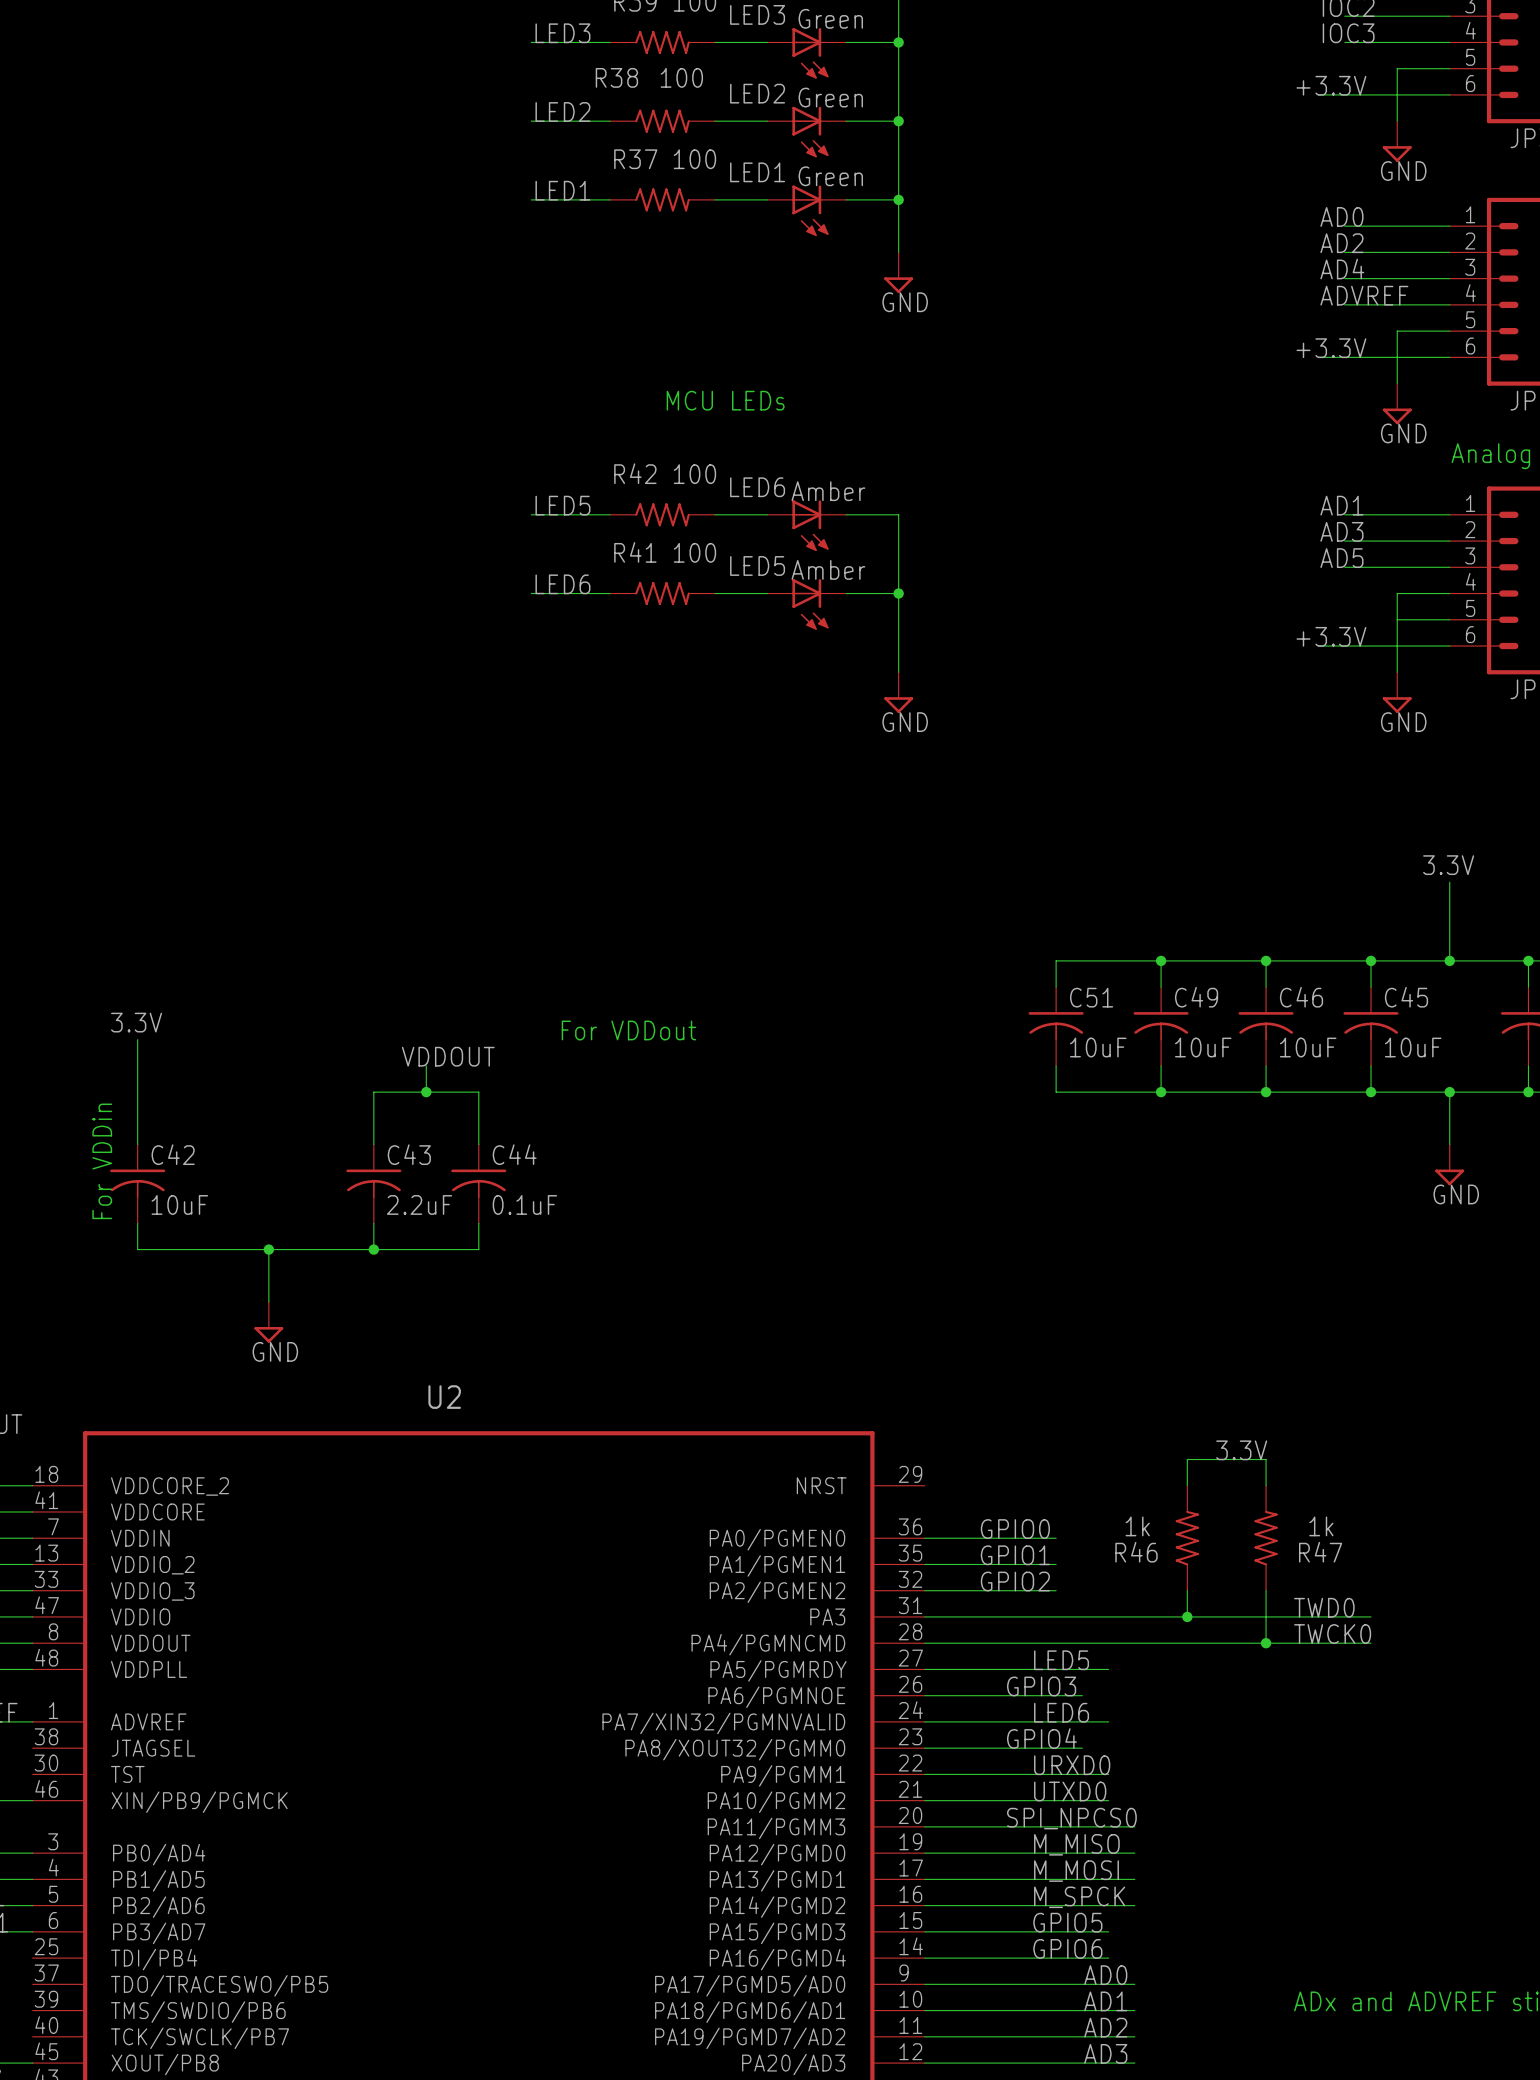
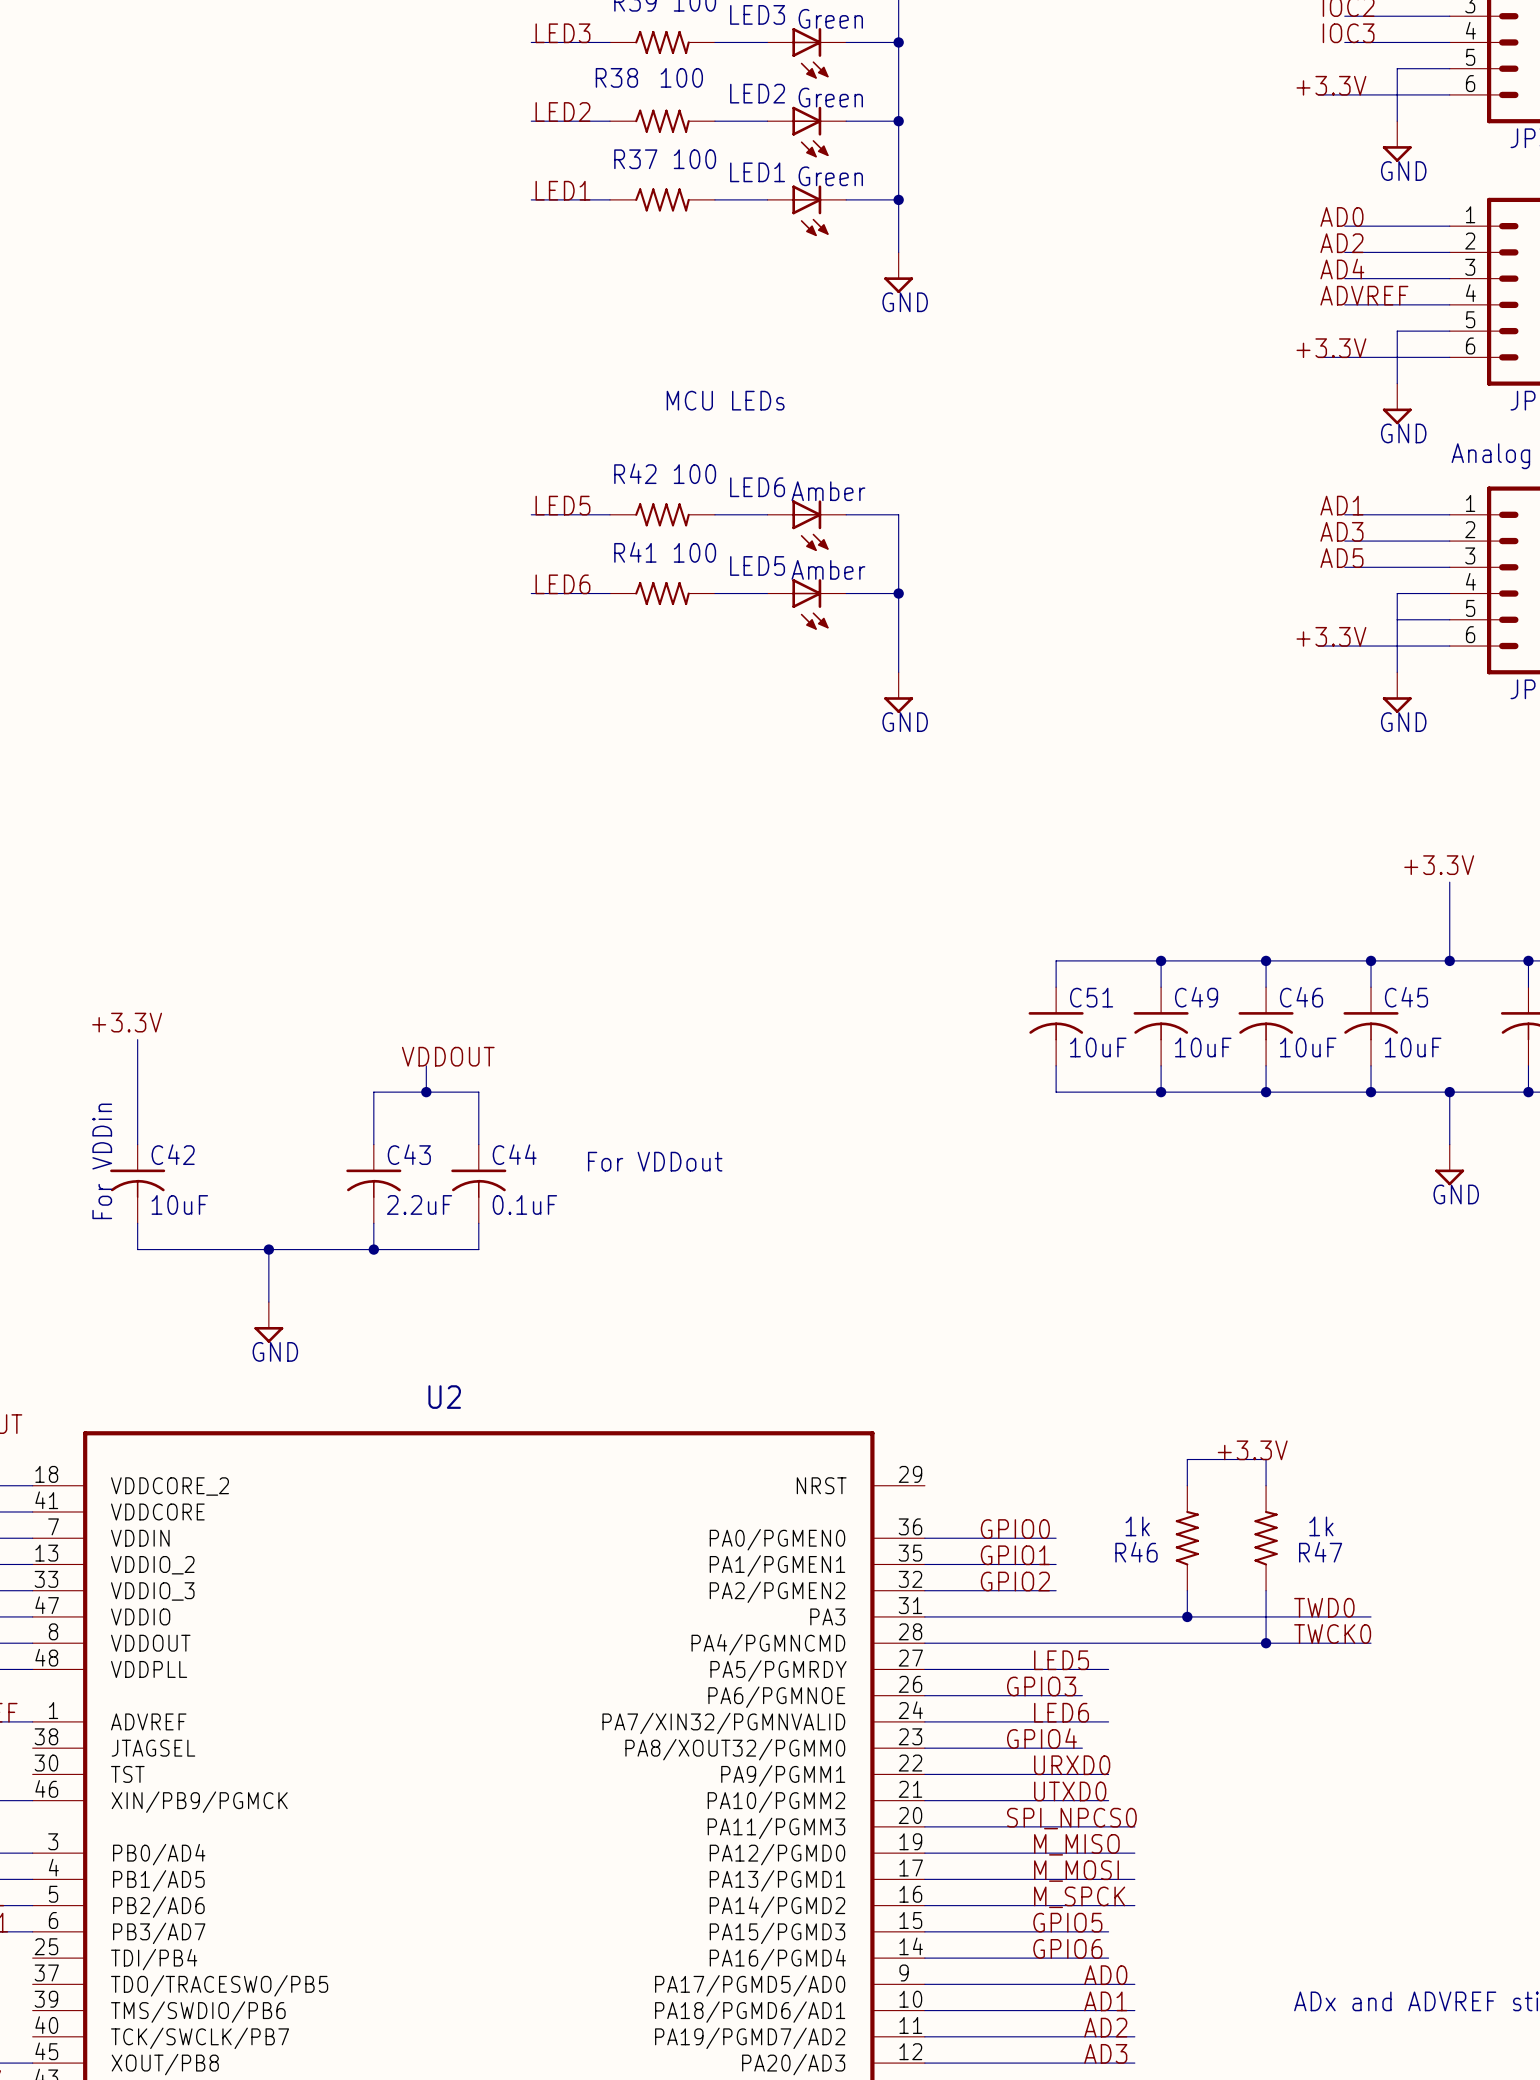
label: 3.3V (1448, 865) -> +3.3V (1439, 865)
label: 3.3V (136, 1022) -> +3.3V (127, 1022)
text position: For VDDout (628, 1030) -> For VDDout (655, 1161)
label: 3.3V (1241, 1450) -> +3.3V (1252, 1450)

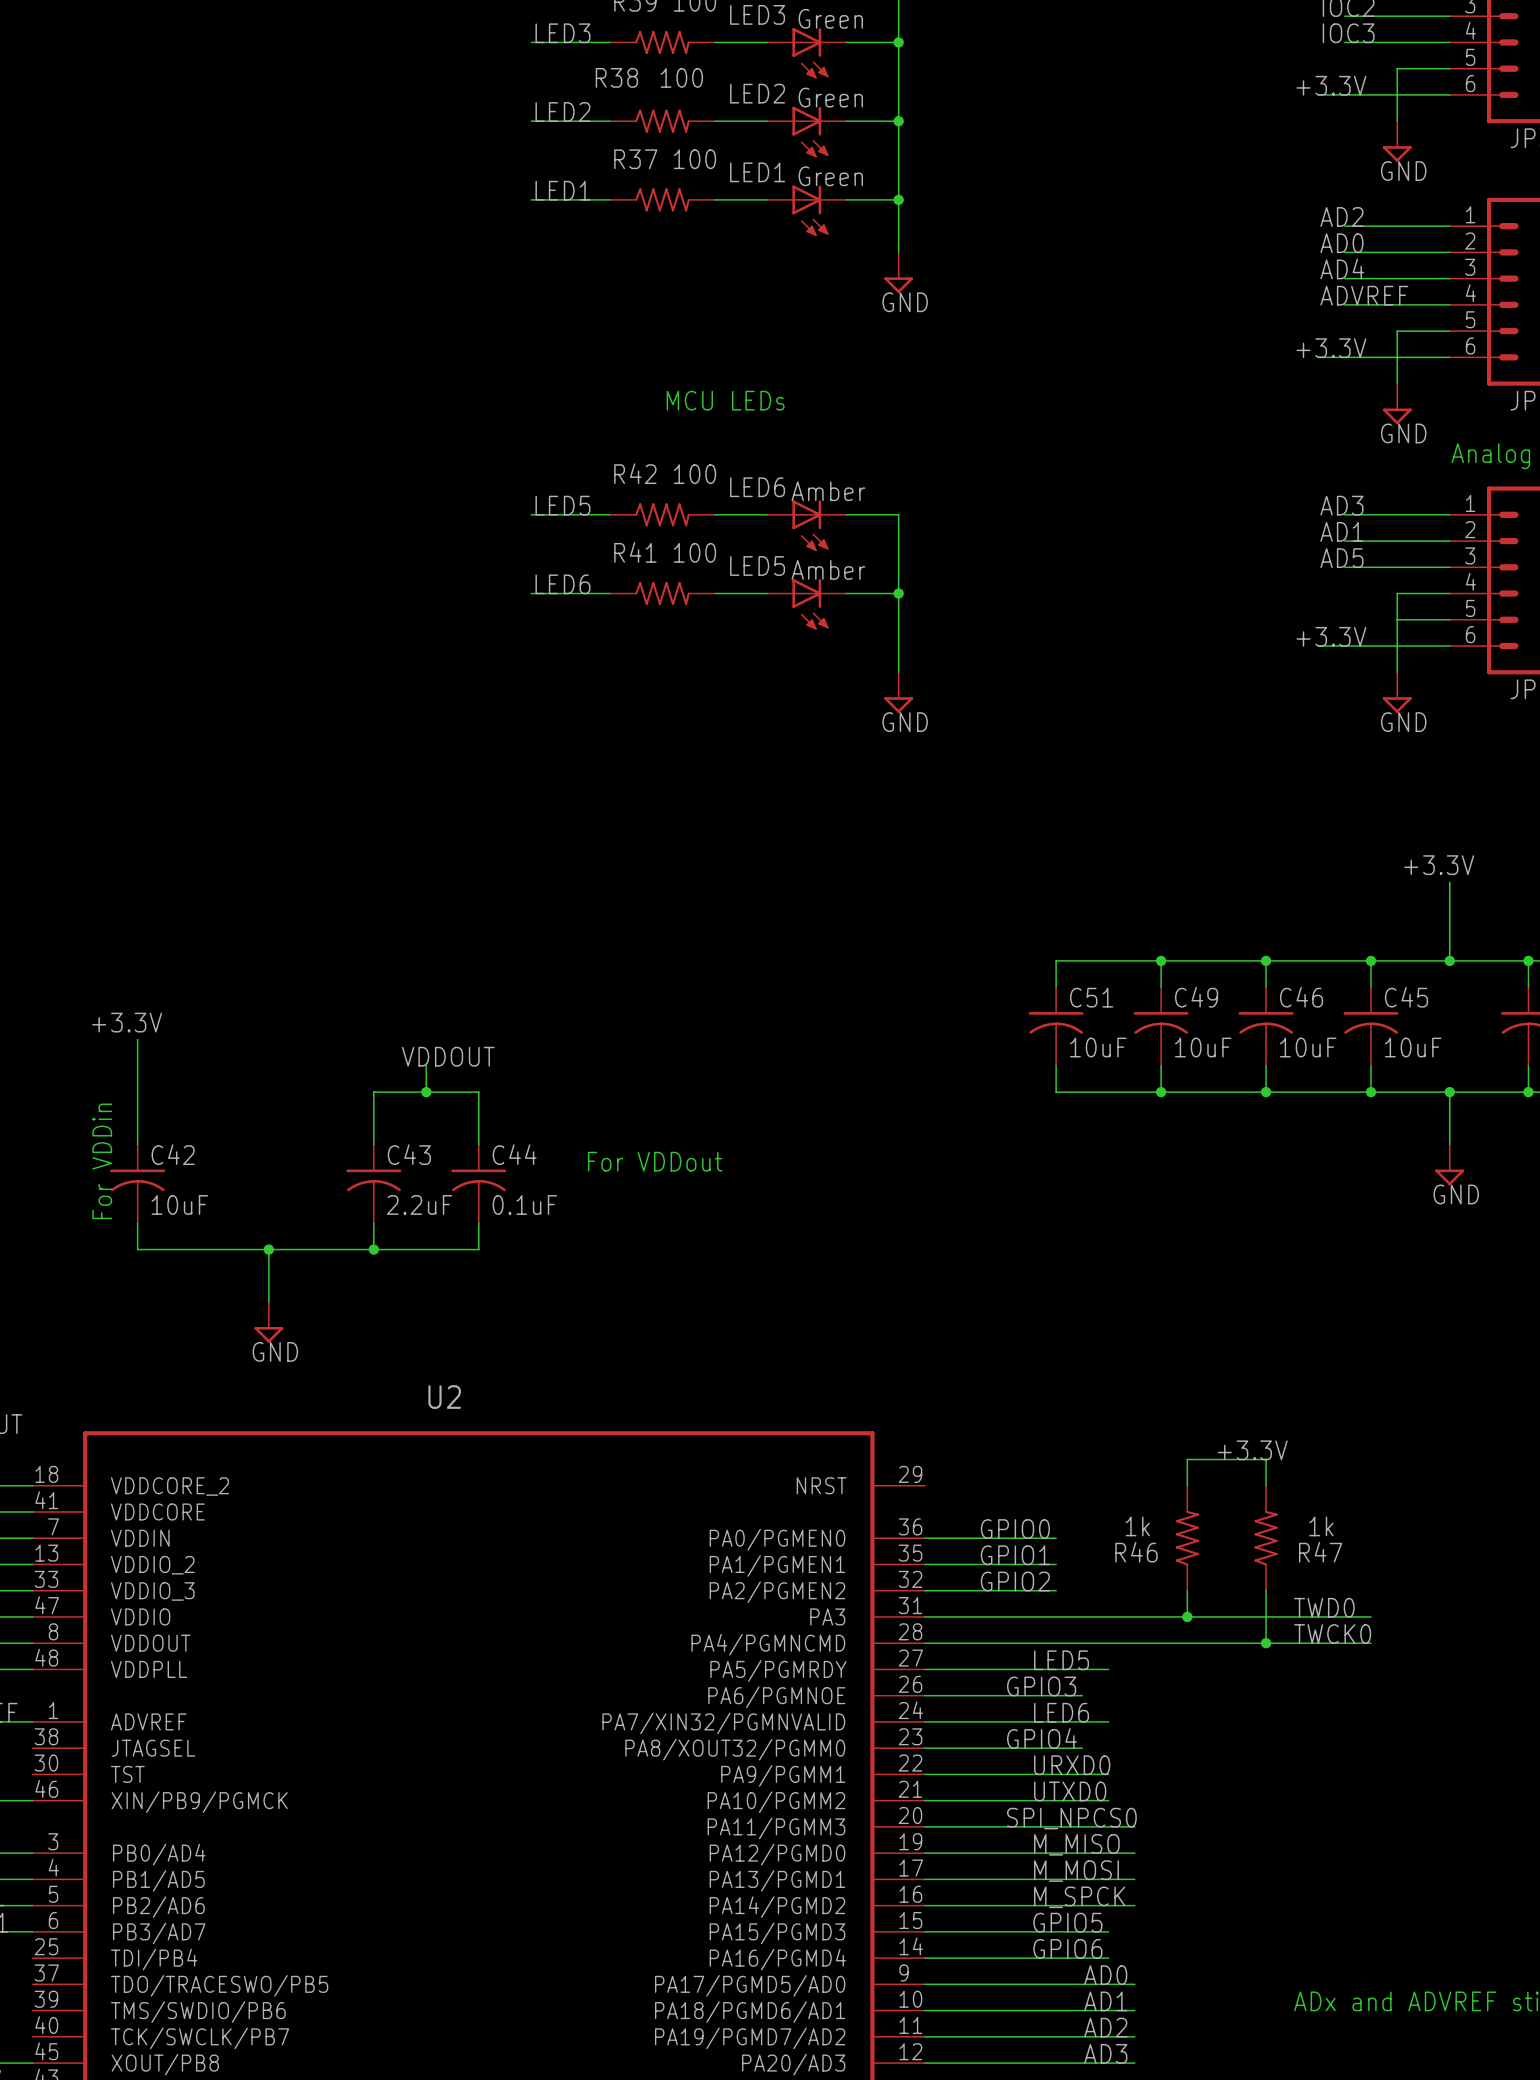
label: AD0 (1341, 216) -> AD2 (1341, 216)
label: AD2 (1341, 243) -> AD0 (1341, 243)
label: AD1 (1341, 505) -> AD3 (1341, 505)
label: AD3 (1341, 531) -> AD1 (1341, 531)

